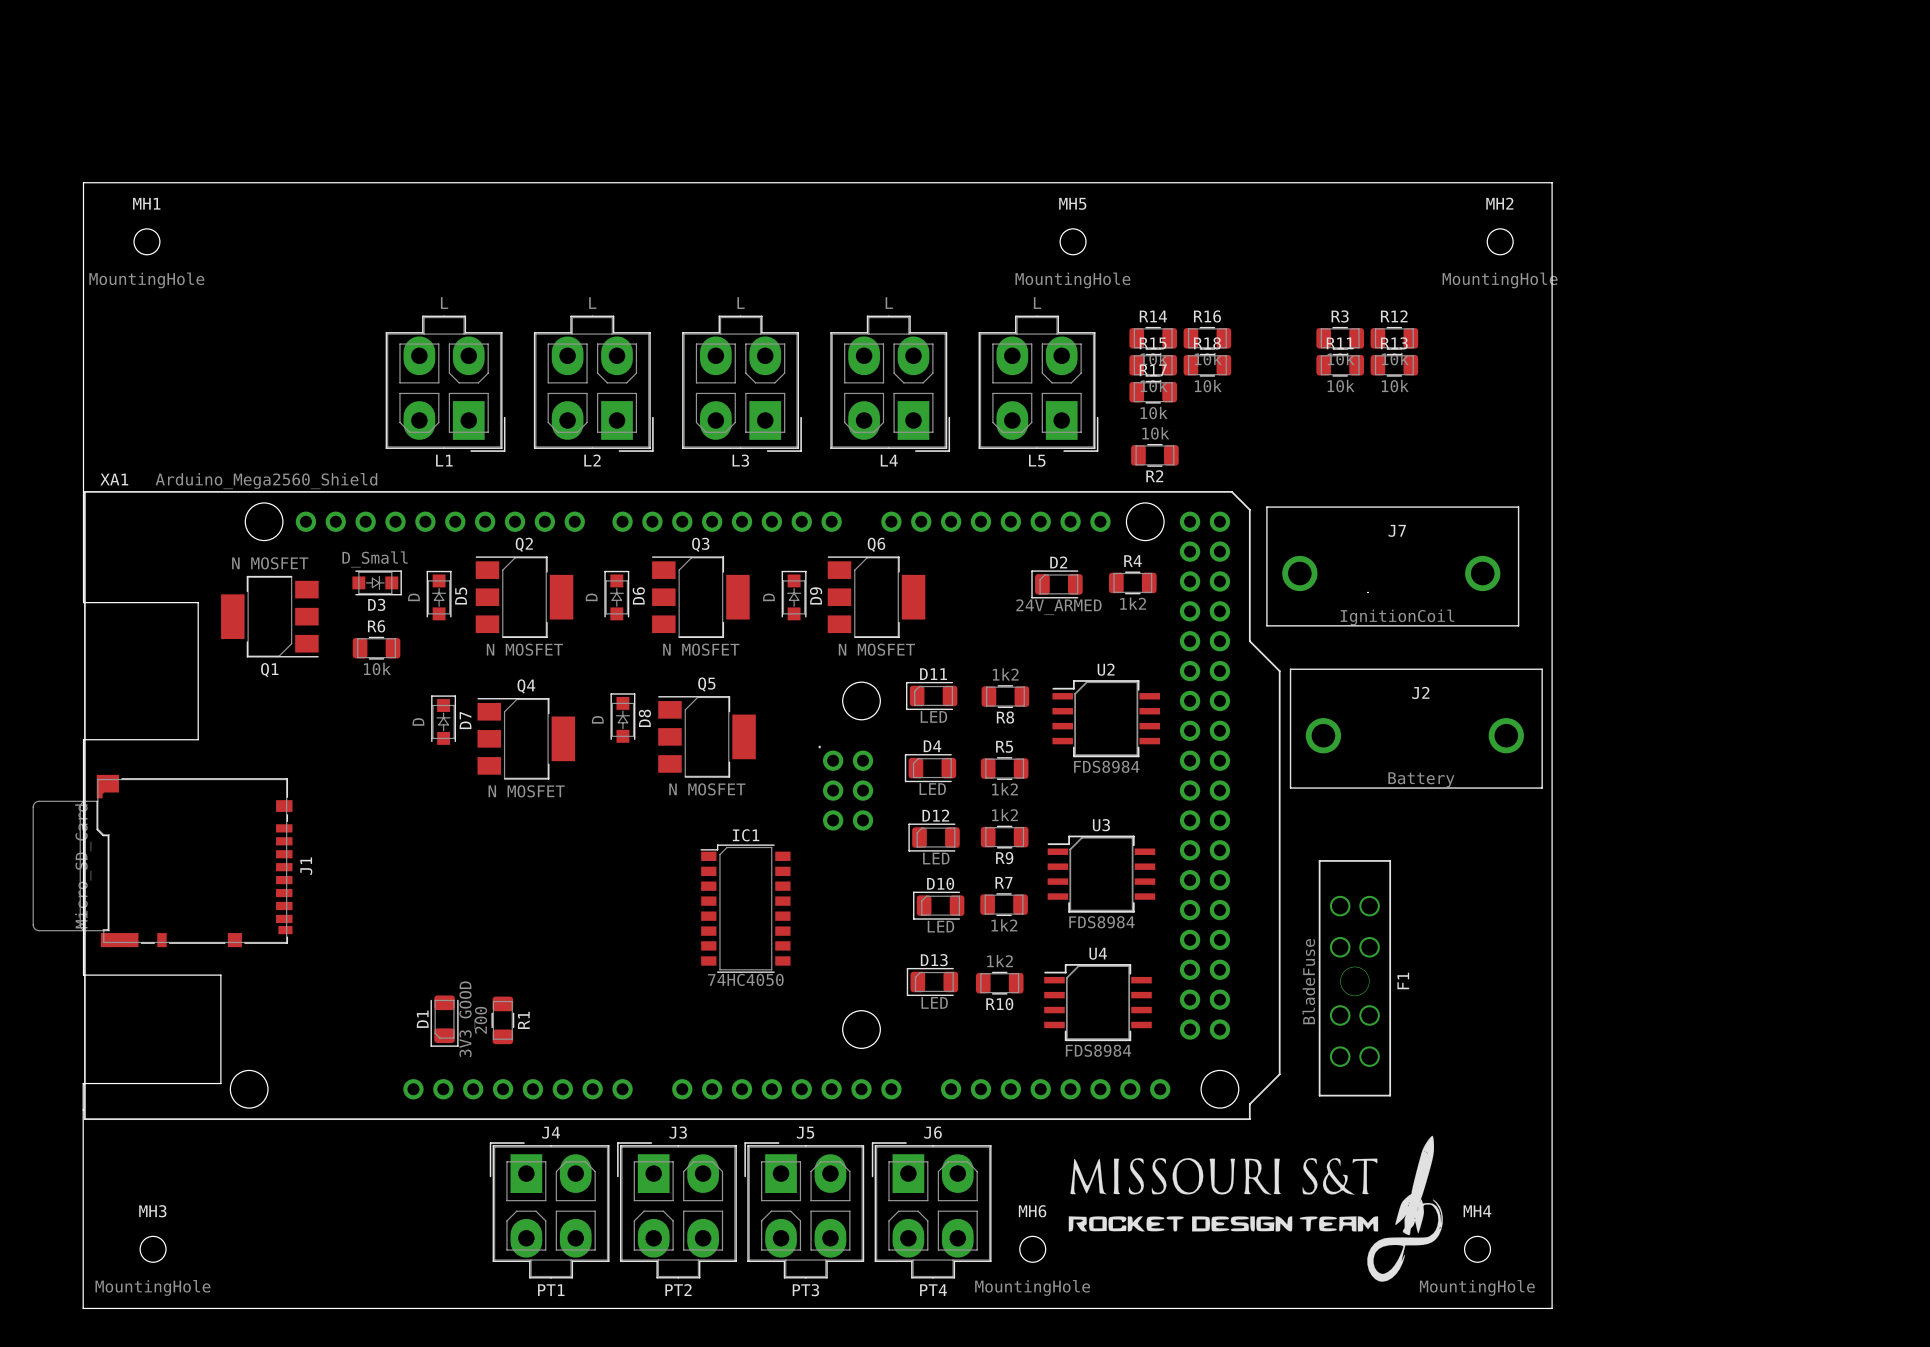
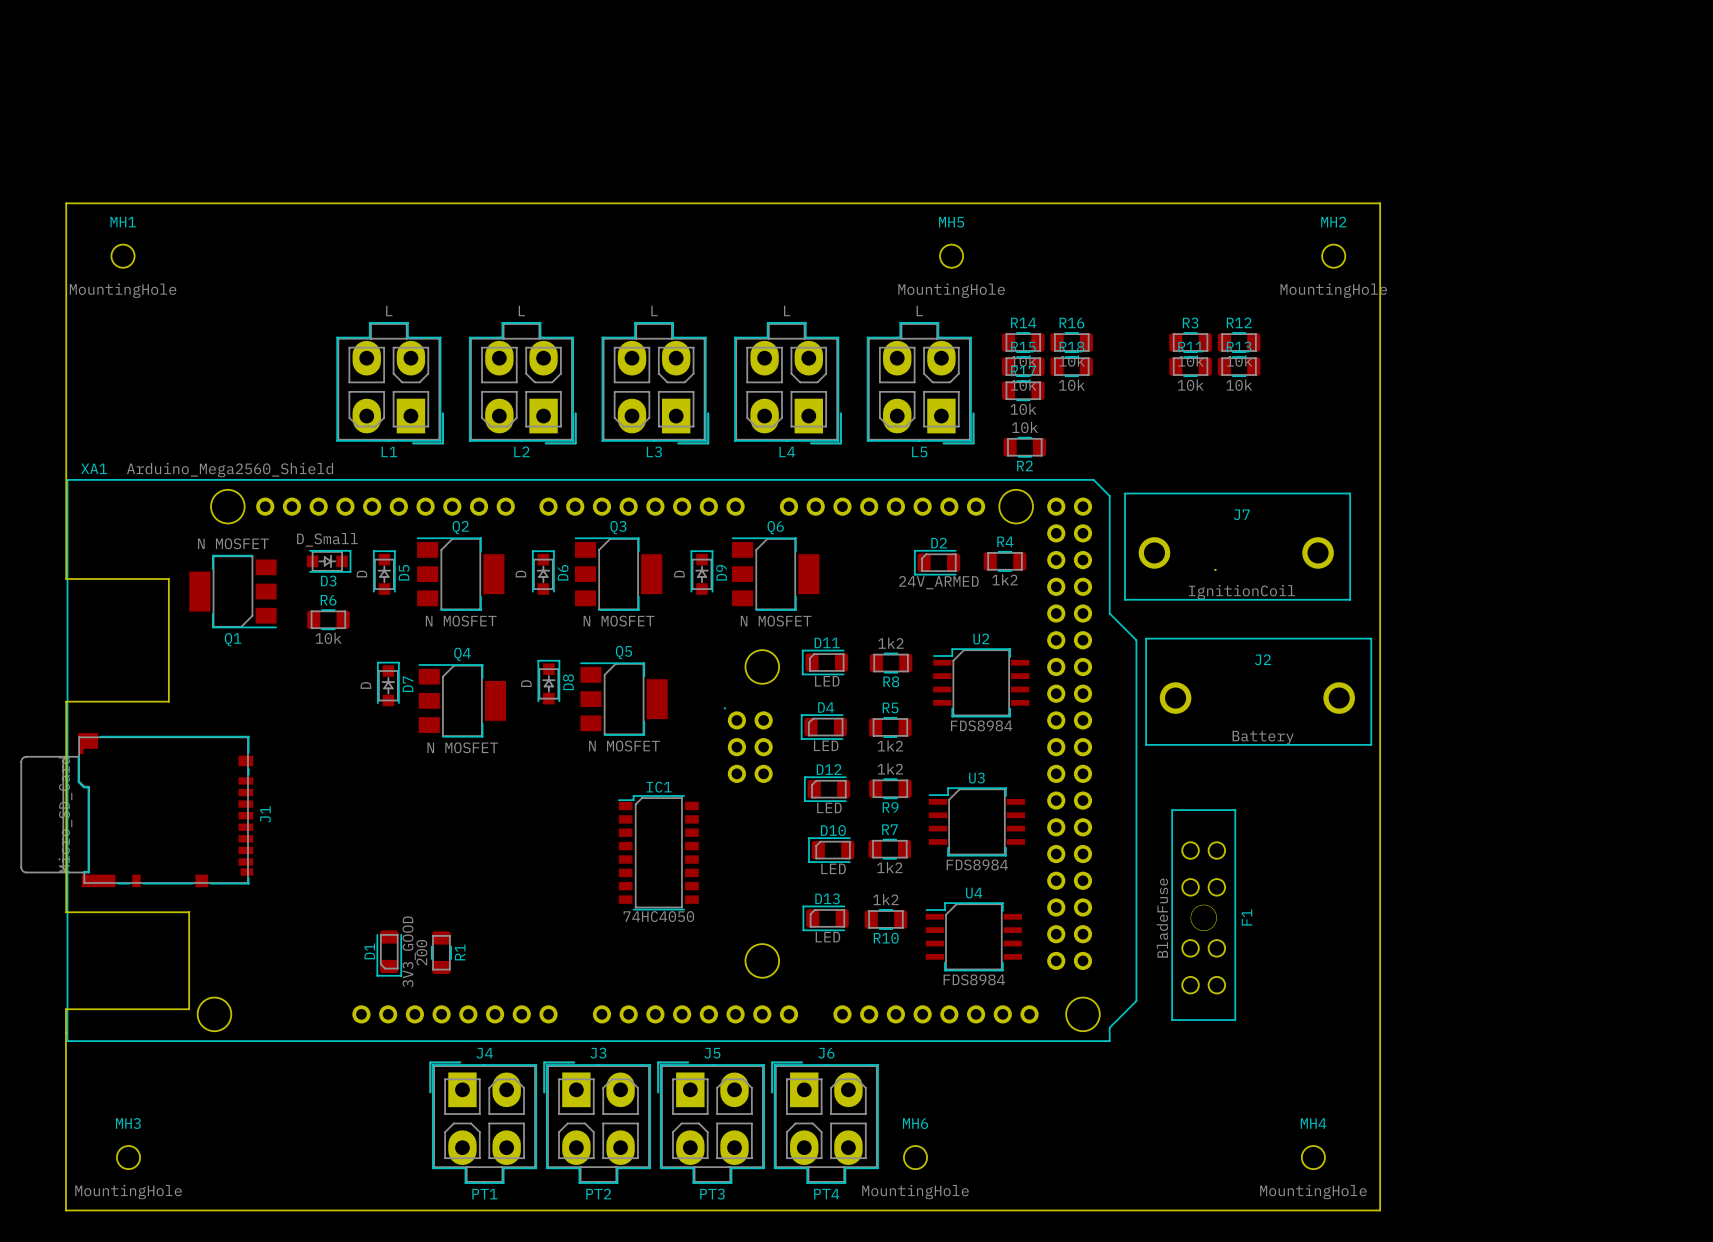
drawing: [1068, 1135, 1443, 1282] -> none

